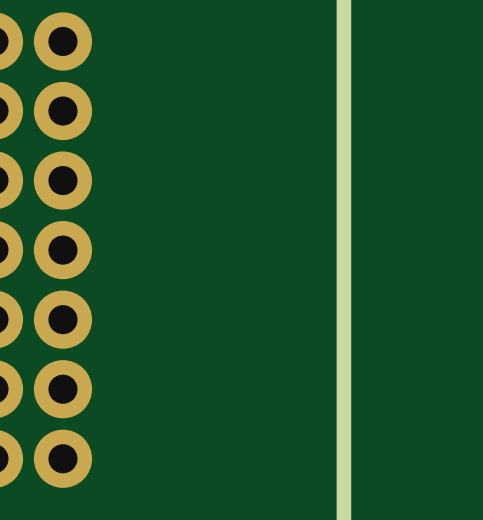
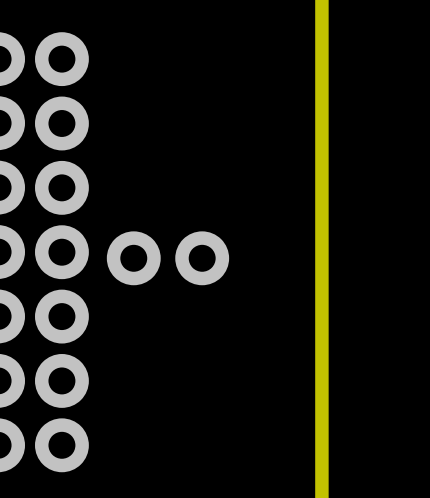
via: none -> (133, 258)
via: none -> (202, 258)

